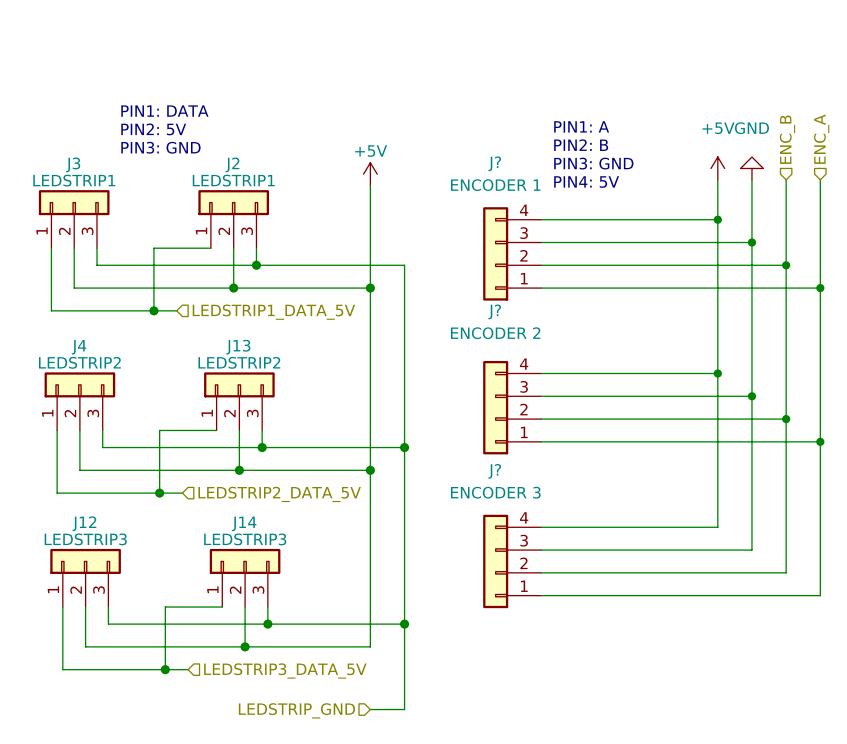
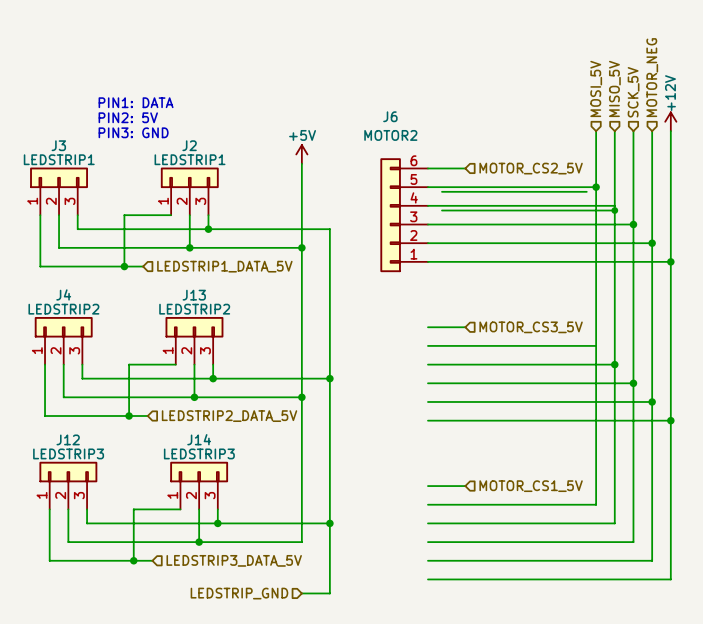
hierarchical label: none -> MOTOR_NEG (652, 77)
hierarchical label: none -> MOSI_5V (596, 88)
hierarchical label: none -> MISO_5V (614, 88)
hierarchical label: none -> SCK_5V (633, 92)
text: PIN1: A (581, 126) -> none
power symbol: none -> +12V (670, 121)
hierarchical label: ENC_B (787, 139) -> none
hierarchical label: ENC_A (821, 139) -> none
text: PIN2: B (581, 145) -> none
wire: none -> (596, 131) (596, 504) (427, 504)
wire: none -> (614, 131) (614, 159)
wire: none -> (633, 131) (633, 542) (427, 542)
wire: none -> (652, 131) (652, 560) (427, 560)
wire: none -> (670, 131) (670, 159)
text: PIN3: GND (593, 163) -> none
power symbol: +5V (717, 168) -> none
power symbol: GND (751, 168) -> none
wire: (717, 179) (717, 527) (541, 527) -> none
wire: (786, 179) (786, 572) (541, 572) -> none
text: PIN4: 5V (586, 182) -> none
wire: none -> (427, 168) (465, 168)
hierarchical label: none -> MOTOR_CS2_5V (531, 168)
wire: none -> (427, 187) (596, 187)
junction: none -> (596, 187)
junction: (717, 219) -> none
wire: none -> (427, 205) (614, 205)
J6: none -> MOTOR2 (404, 215)
J?: ENCODER 1 (512, 253) -> none
wire: none -> (427, 224) (633, 224)
junction: none -> (633, 224)
wire: (541, 265) (786, 265) -> none
junction: (786, 265) -> none
wire: none -> (427, 243) (652, 243)
junction: none -> (652, 243)
wire: (541, 288) (820, 288) -> none
junction: (820, 288) -> none
wire: none -> (427, 261) (670, 261)
junction: none -> (670, 261)
wire: (541, 373) (717, 373) -> none
junction: (717, 373) -> none
wire: none -> (427, 327) (465, 327)
hierarchical label: none -> MOTOR_CS3_5V (531, 327)
wire: (541, 396) (751, 396) -> none
junction: (751, 396) -> none
J?: ENCODER 2 (512, 407) -> none
wire: none -> (427, 345) (596, 345)
wire: (541, 419) (786, 419) -> none
junction: (786, 419) -> none
wire: none -> (427, 364) (614, 364)
junction: none -> (614, 364)
wire: (541, 441) (820, 441) -> none
junction: (820, 441) -> none
wire: none -> (427, 383) (633, 383)
junction: none -> (633, 383)
wire: none -> (427, 401) (652, 401)
junction: none -> (652, 401)
wire: none -> (427, 420) (670, 420)
junction: none -> (670, 420)
wire: (541, 550) (751, 550) -> (427, 523) (614, 523) (614, 462)
J?: ENCODER 3 (512, 561) -> none
wire: none -> (427, 486) (465, 486)
hierarchical label: none -> MOTOR_CS1_5V (531, 486)
wire: (541, 595) (820, 595) -> (427, 579) (670, 579) (670, 500)

